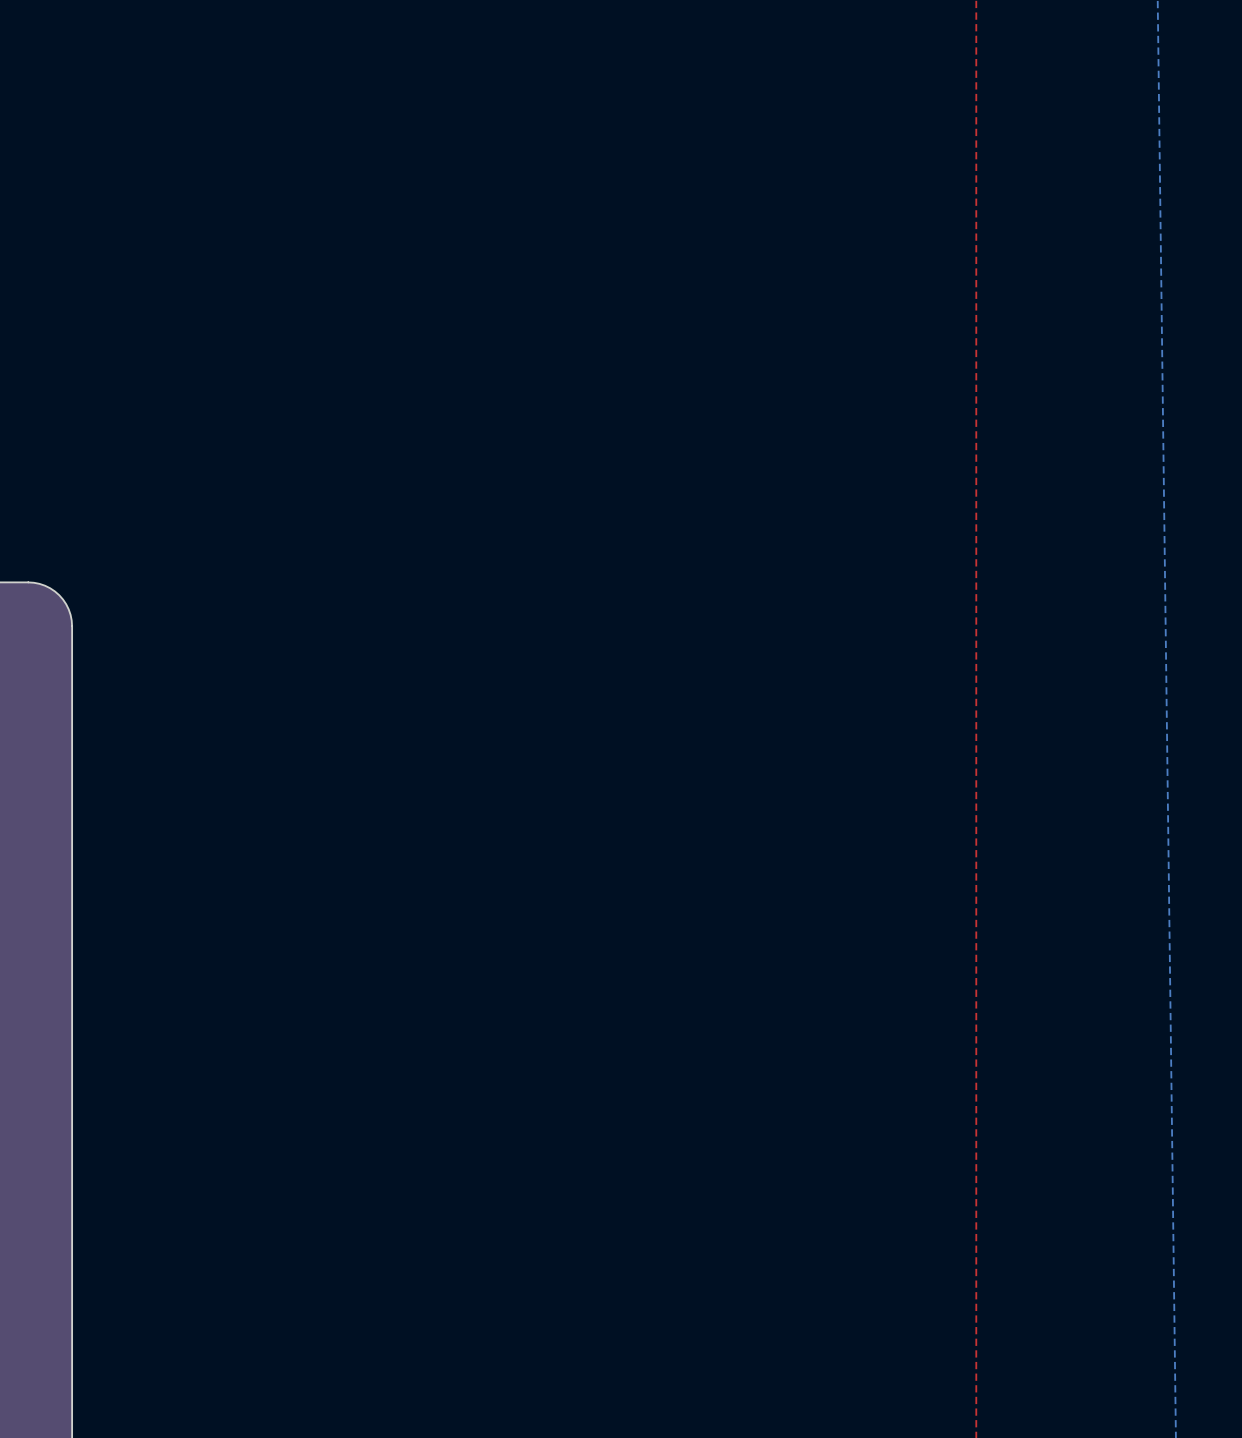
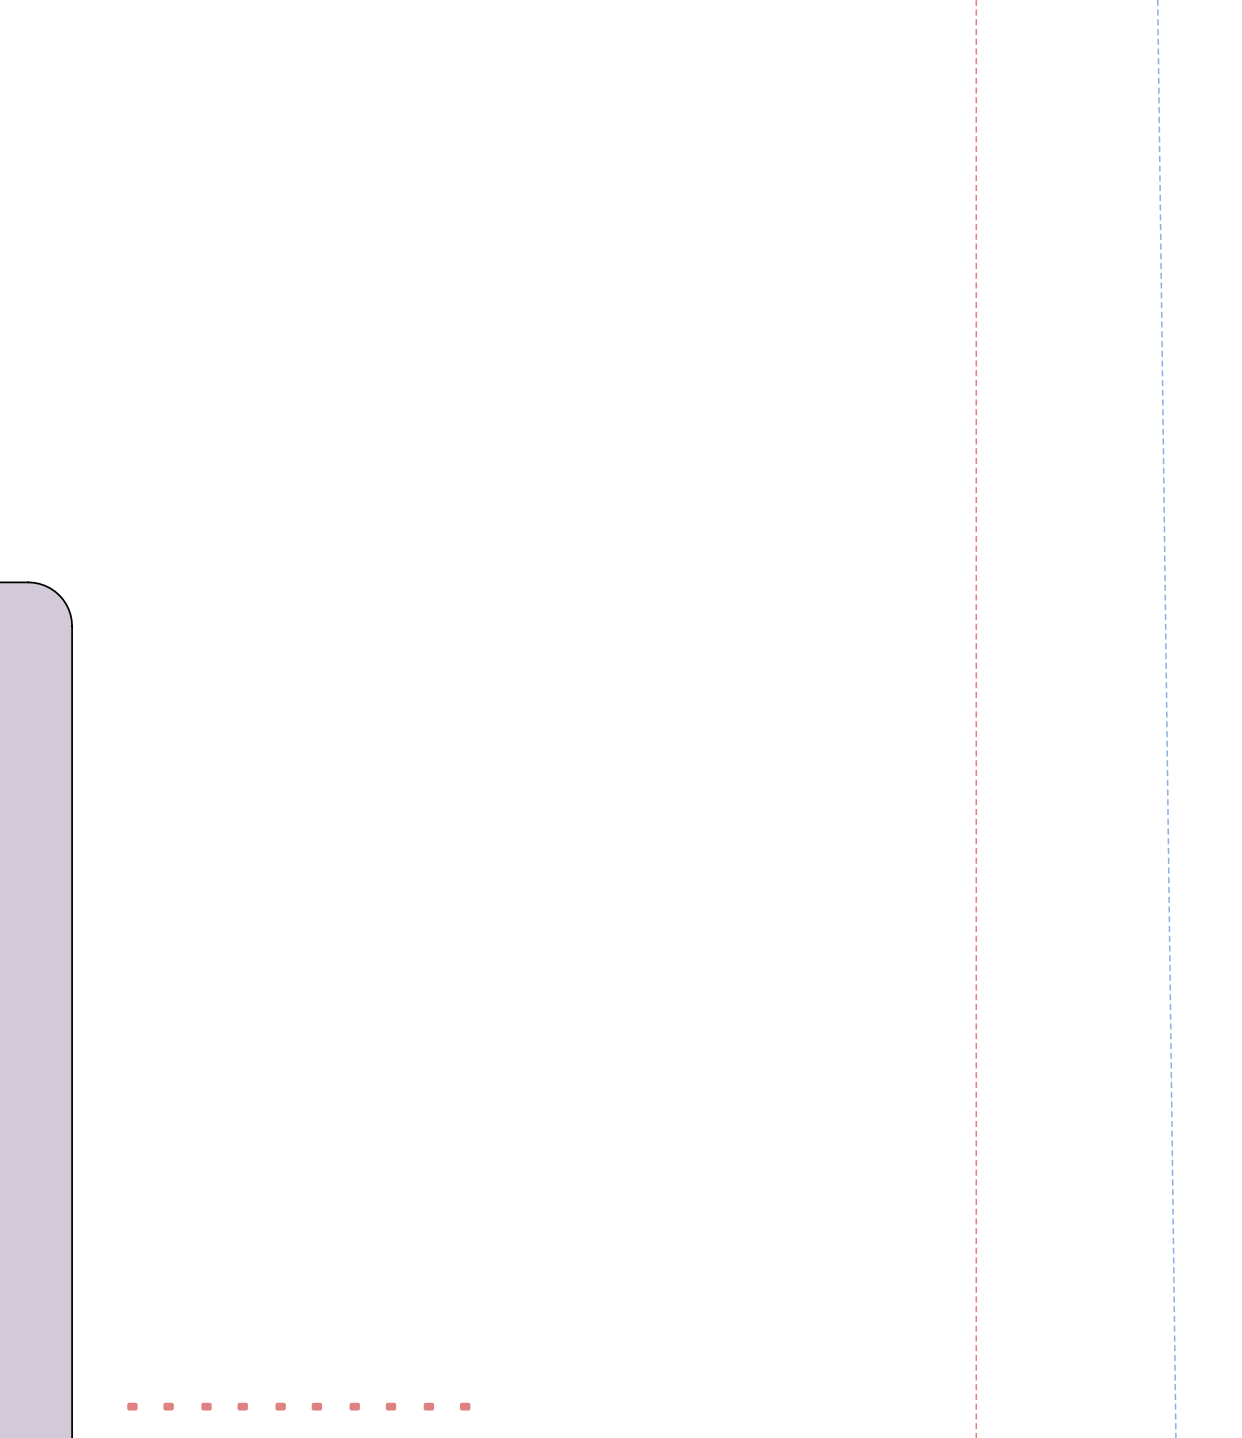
part: none -> (150, 1406)
part: none -> (224, 1406)
part: none -> (298, 1406)
part: none -> (372, 1406)
part: none -> (447, 1406)

